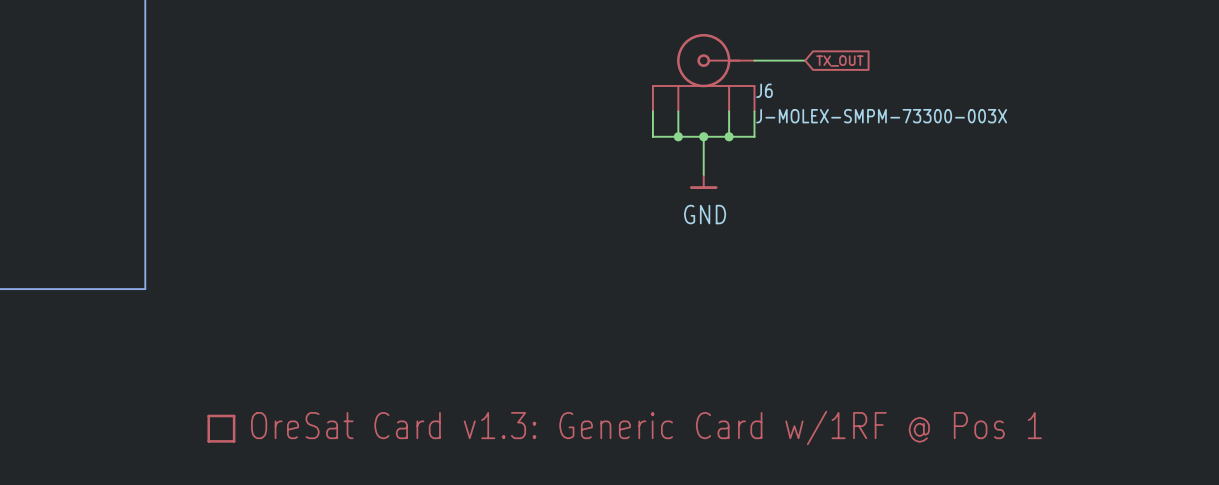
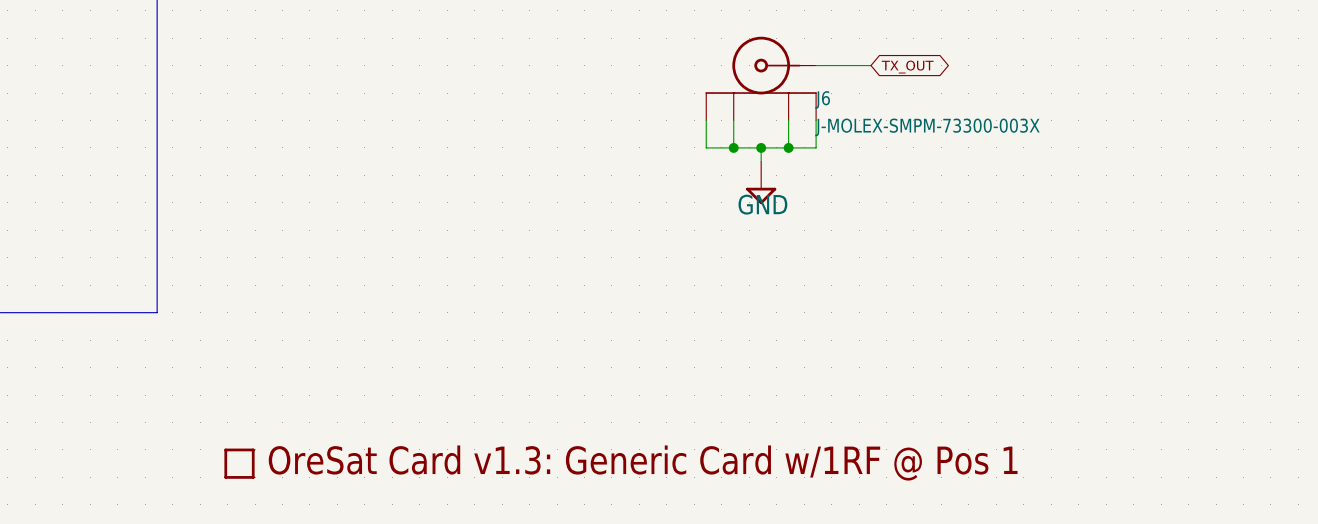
global label shape: input (839, 61) -> bidirectional (907, 67)
power symbol: none -> GND (761, 182)
power symbol: GND (703, 181) -> none

